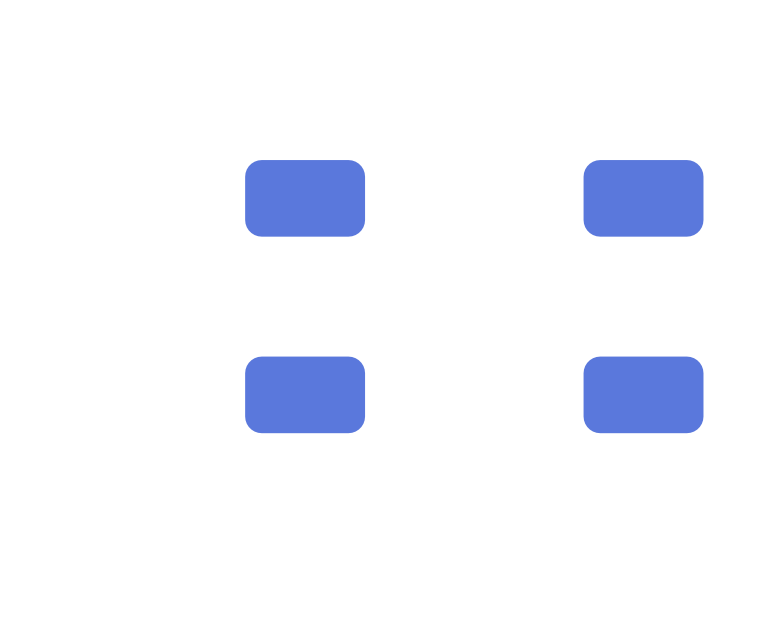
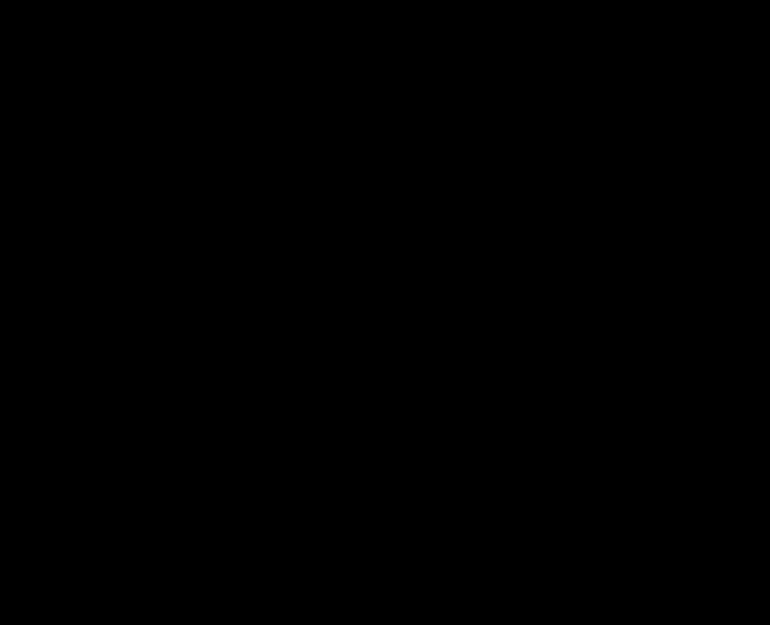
part: (305, 296) -> none
part: (643, 296) -> none

